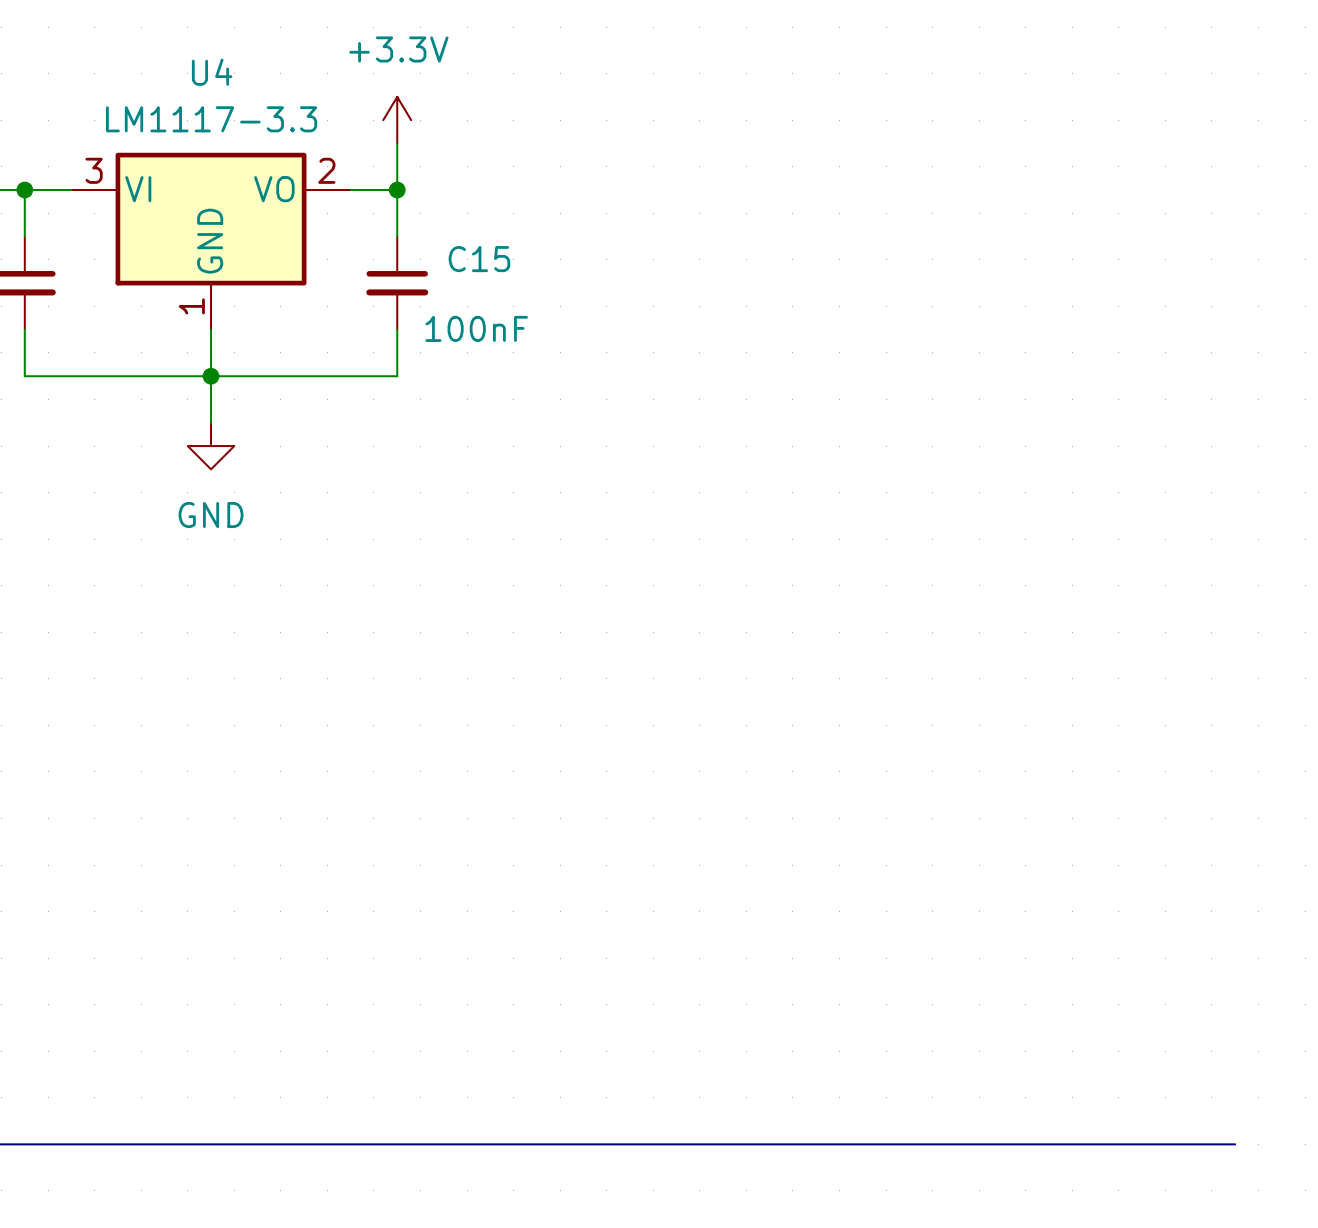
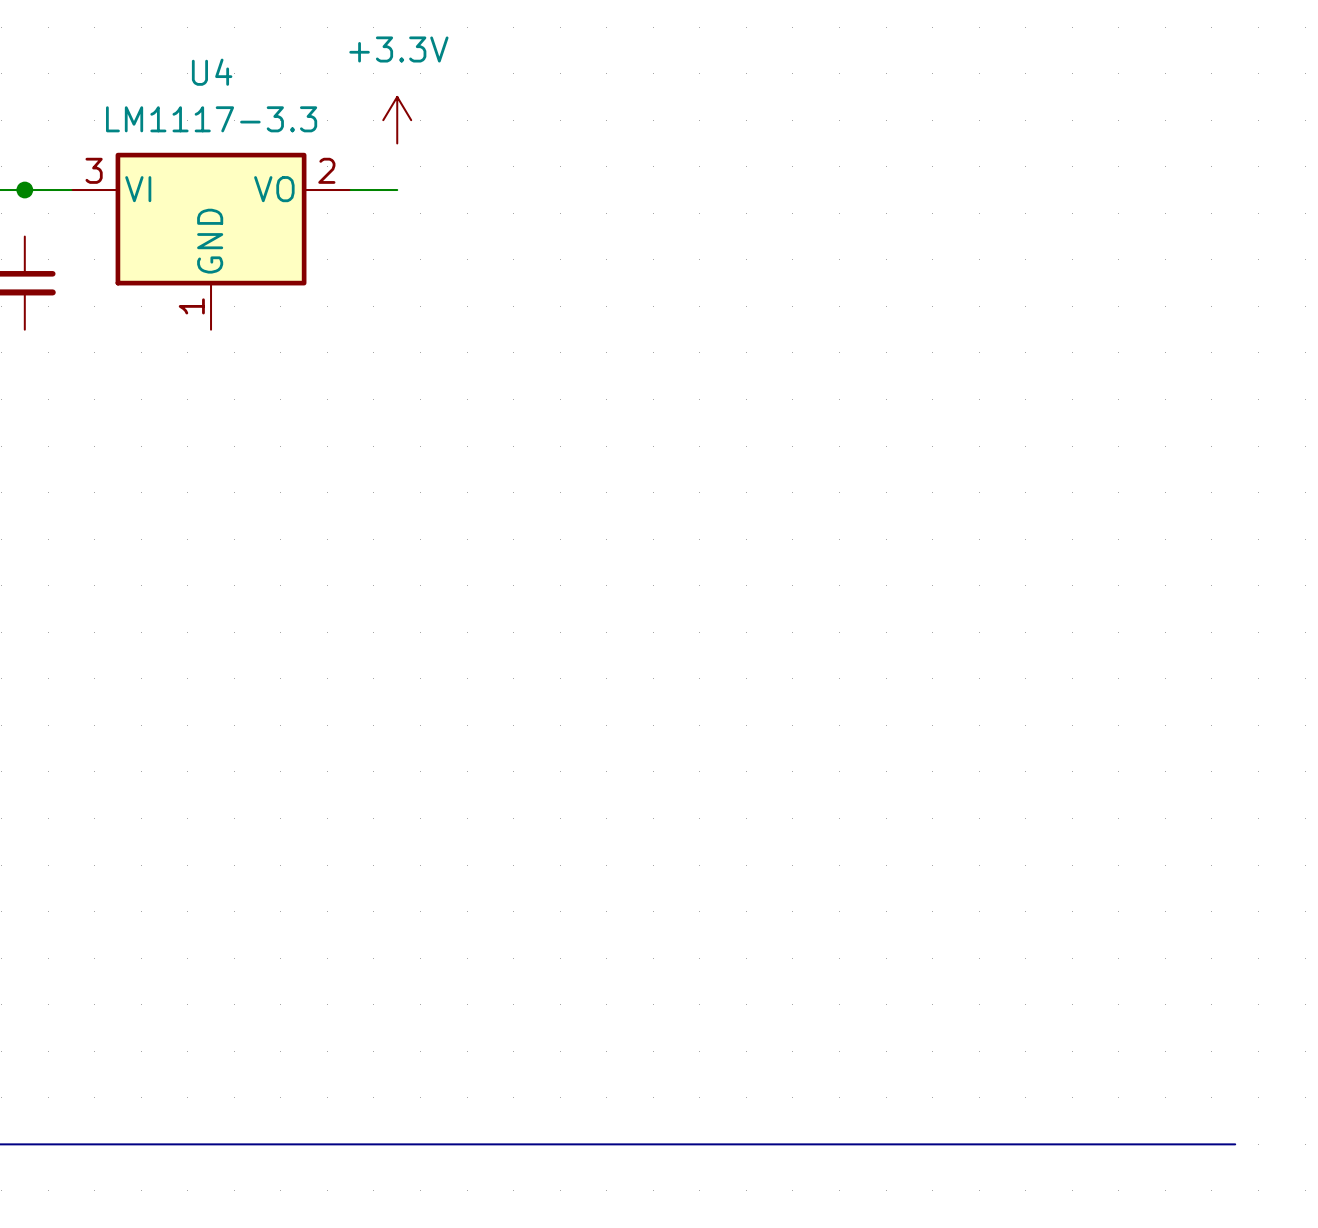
wire: (397, 143) (397, 236) -> none
wire: (24, 190) (24, 236) -> none
junction: (397, 190) -> none
C15: 100nF (397, 283) -> none
wire: (24, 329) (24, 376) (397, 376) (397, 329) -> none
wire: (211, 329) (211, 422) -> none
junction: (211, 376) -> none
power symbol: GND (211, 446) -> none

